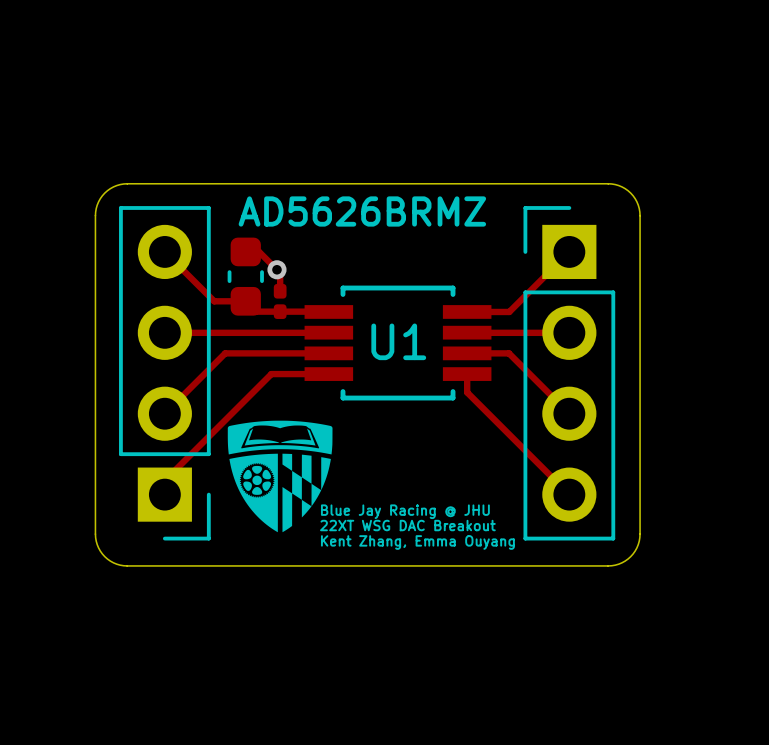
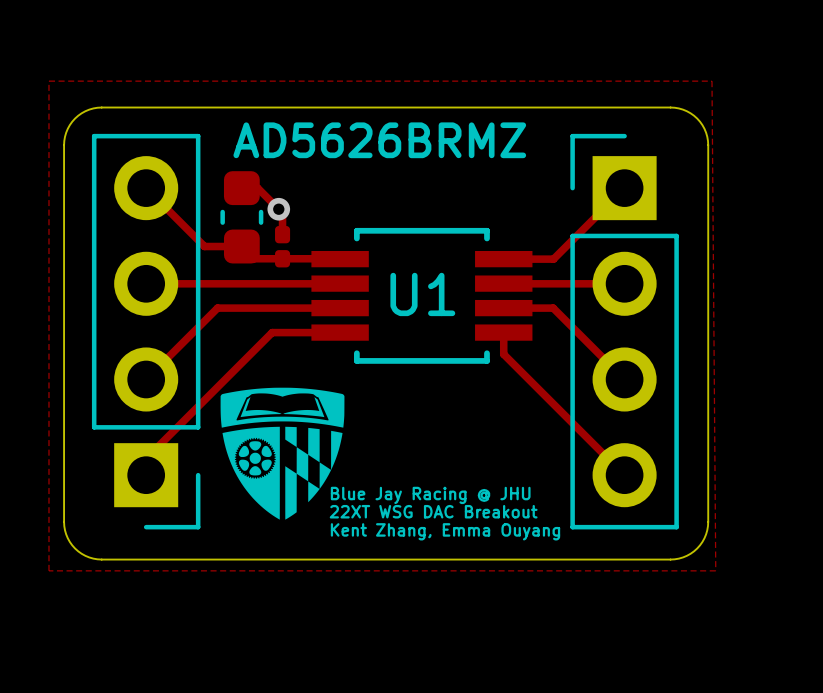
zone outline: none -> (48, 81) (711, 81) (715, 570) (48, 570) (48, 81)

